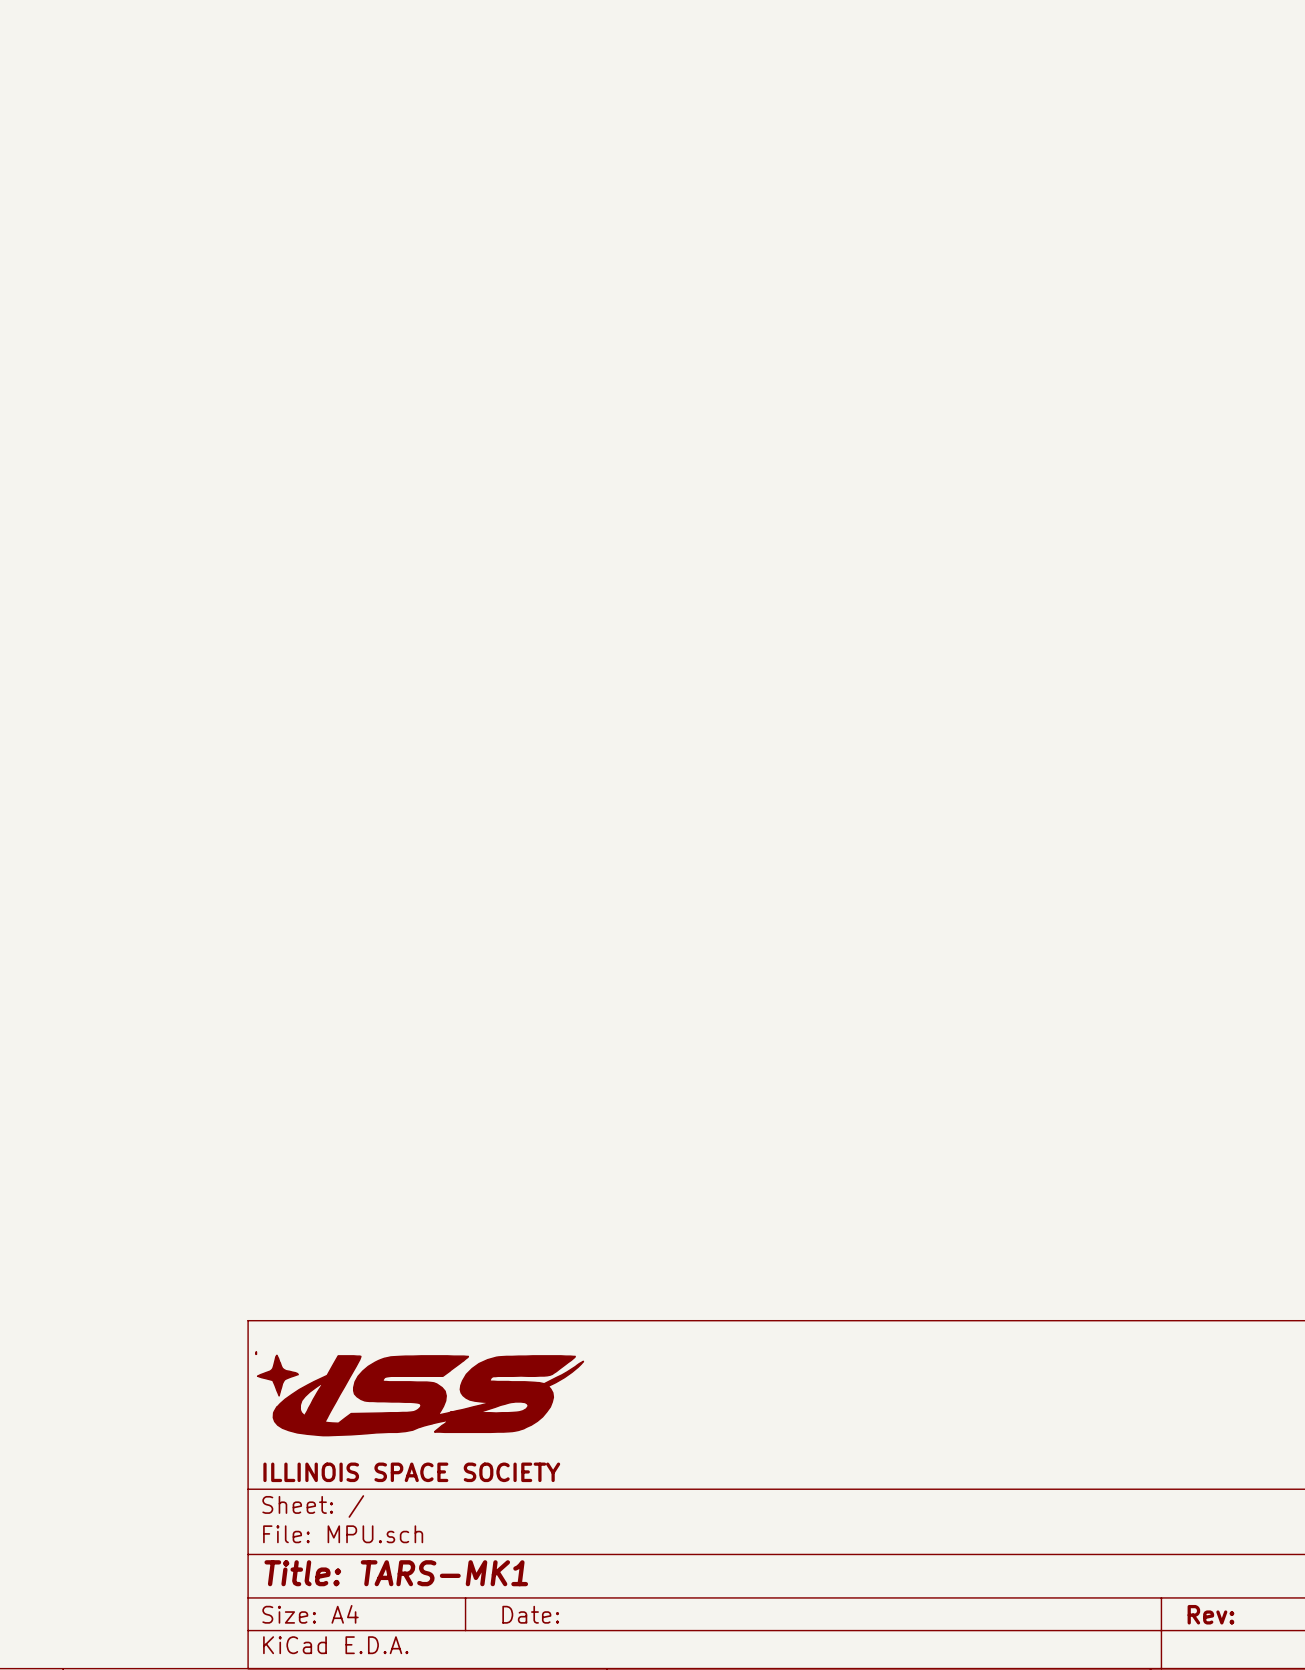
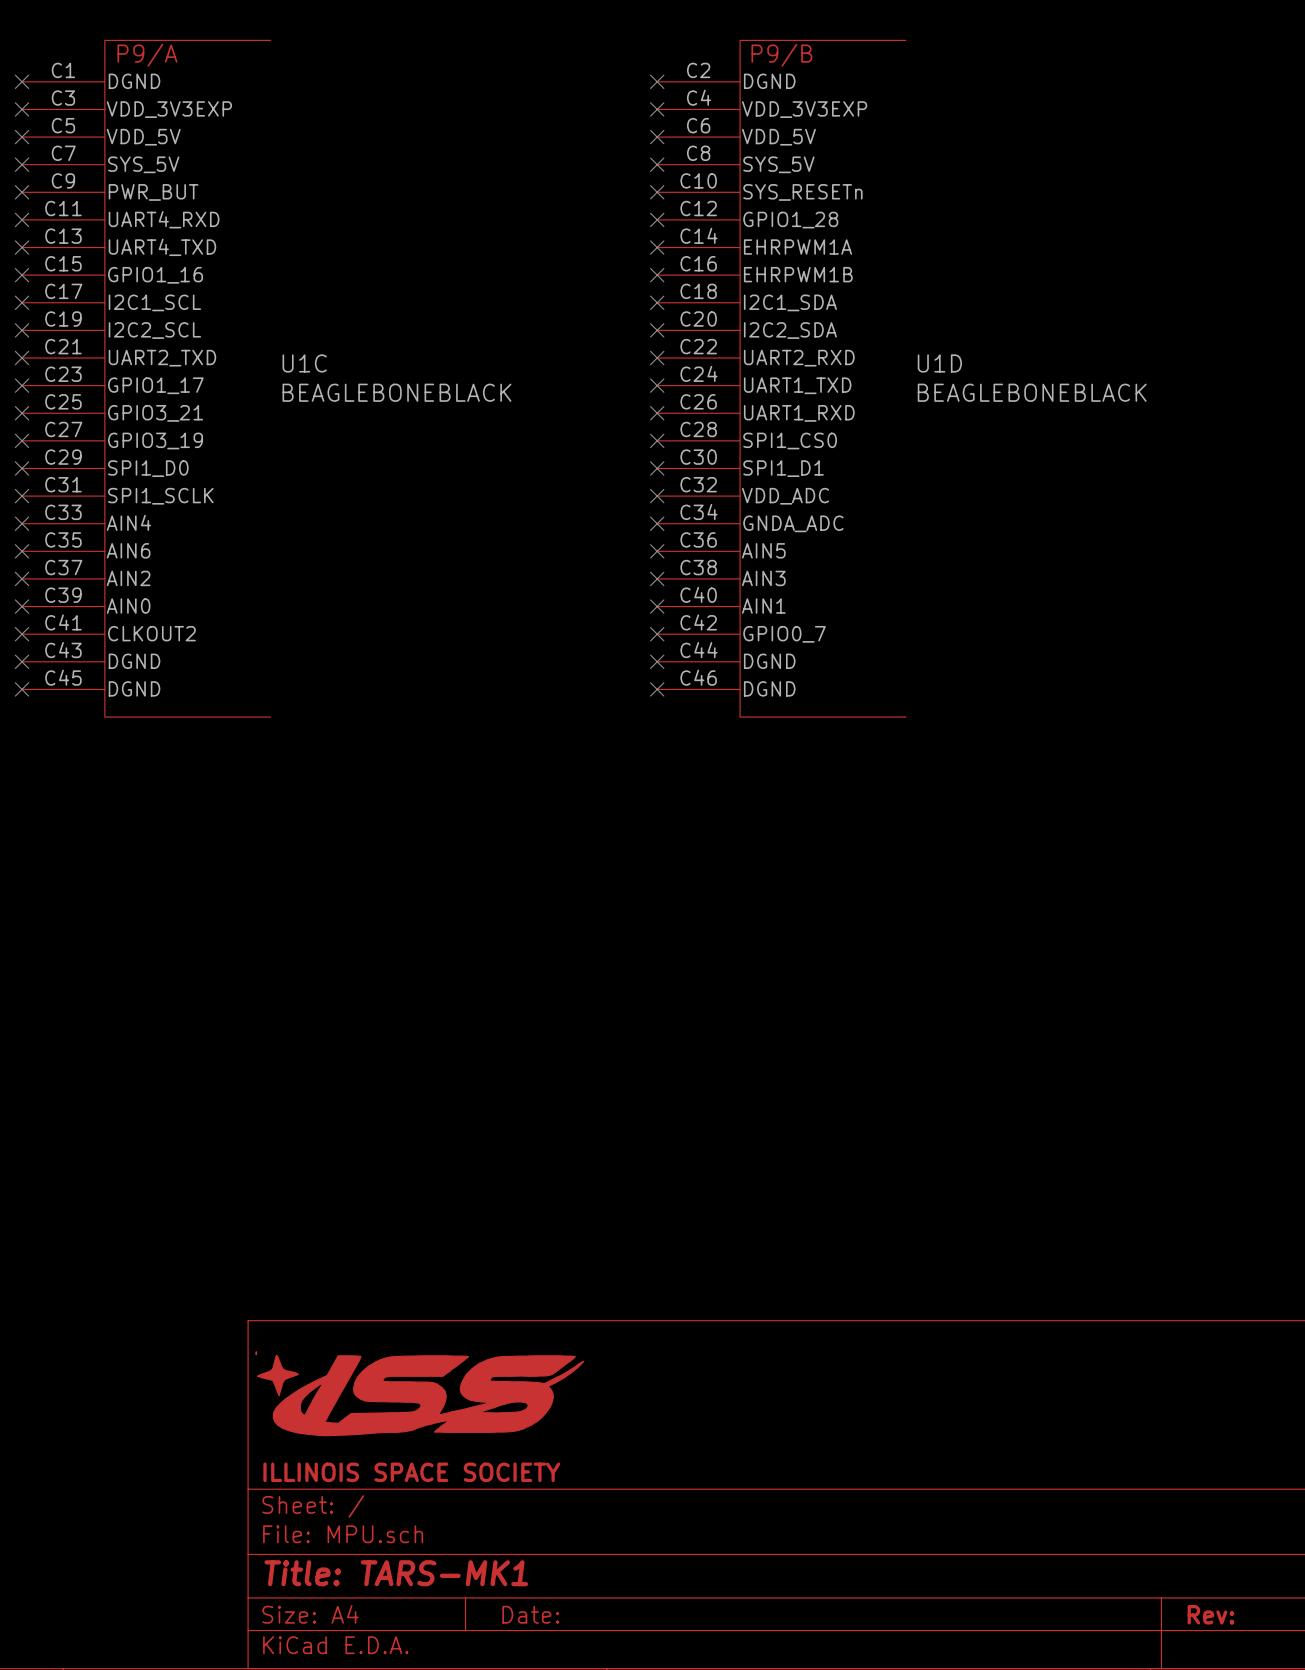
no-connect mark: none -> (22, 81)
no-connect mark: none -> (657, 81)
no-connect mark: none -> (22, 109)
no-connect mark: none -> (657, 109)
no-connect mark: none -> (22, 137)
no-connect mark: none -> (657, 137)
no-connect mark: none -> (22, 164)
no-connect mark: none -> (657, 164)
no-connect mark: none -> (22, 192)
no-connect mark: none -> (657, 192)
no-connect mark: none -> (22, 219)
no-connect mark: none -> (657, 219)
no-connect mark: none -> (22, 247)
no-connect mark: none -> (657, 247)
no-connect mark: none -> (22, 275)
no-connect mark: none -> (657, 275)
no-connect mark: none -> (22, 302)
no-connect mark: none -> (657, 302)
no-connect mark: none -> (22, 330)
no-connect mark: none -> (657, 330)
no-connect mark: none -> (22, 358)
no-connect mark: none -> (657, 358)
U1C: none -> BEAGLEBONEBLACK (146, 378)
U1D: none -> BEAGLEBONEBLACK (781, 378)
no-connect mark: none -> (22, 385)
no-connect mark: none -> (657, 385)
no-connect mark: none -> (22, 413)
no-connect mark: none -> (657, 413)
no-connect mark: none -> (22, 440)
no-connect mark: none -> (657, 440)
no-connect mark: none -> (22, 468)
no-connect mark: none -> (657, 468)
no-connect mark: none -> (22, 496)
no-connect mark: none -> (657, 496)
no-connect mark: none -> (22, 523)
no-connect mark: none -> (657, 523)
no-connect mark: none -> (22, 551)
no-connect mark: none -> (657, 551)
no-connect mark: none -> (22, 578)
no-connect mark: none -> (657, 578)
no-connect mark: none -> (22, 606)
no-connect mark: none -> (657, 606)
no-connect mark: none -> (22, 634)
no-connect mark: none -> (657, 634)
no-connect mark: none -> (22, 661)
no-connect mark: none -> (657, 661)
no-connect mark: none -> (22, 689)
no-connect mark: none -> (657, 689)

